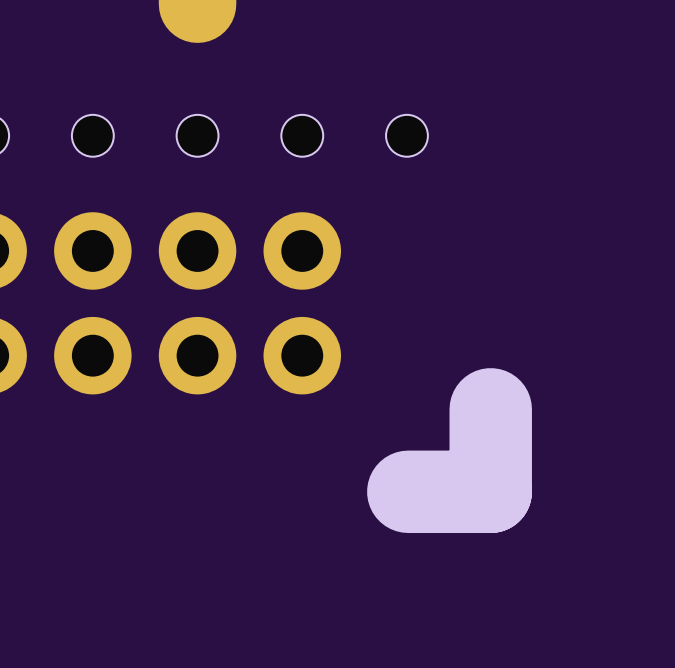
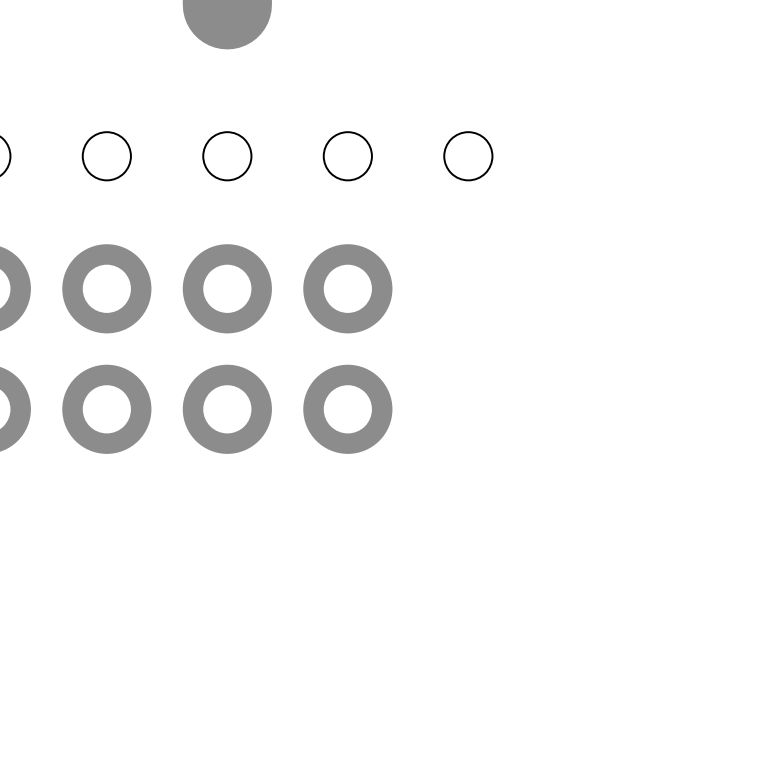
board edge: (490, 409) (490, 491) (408, 491) -> none

